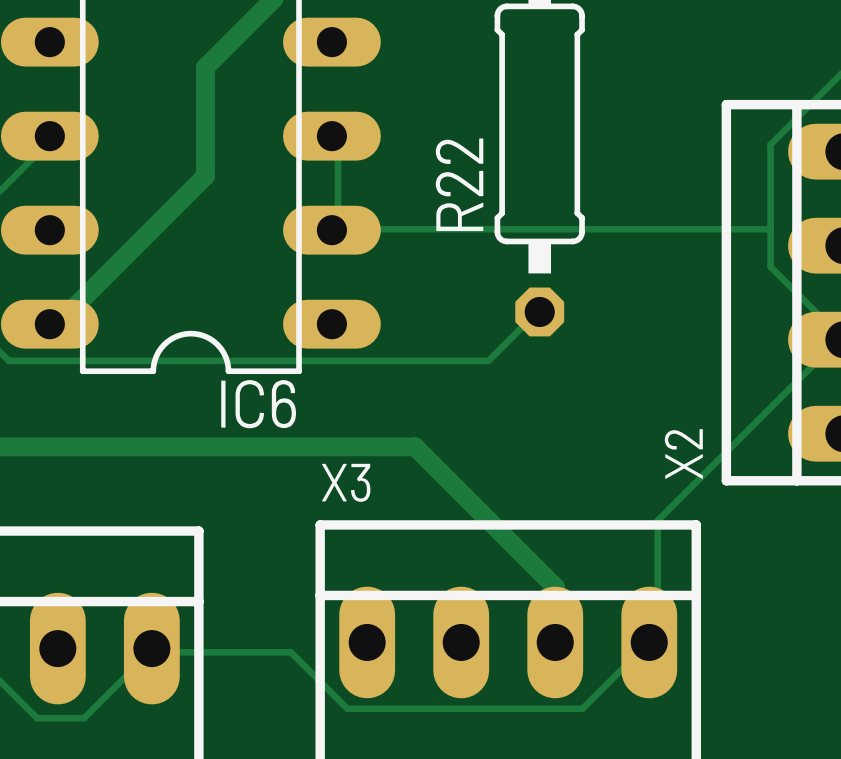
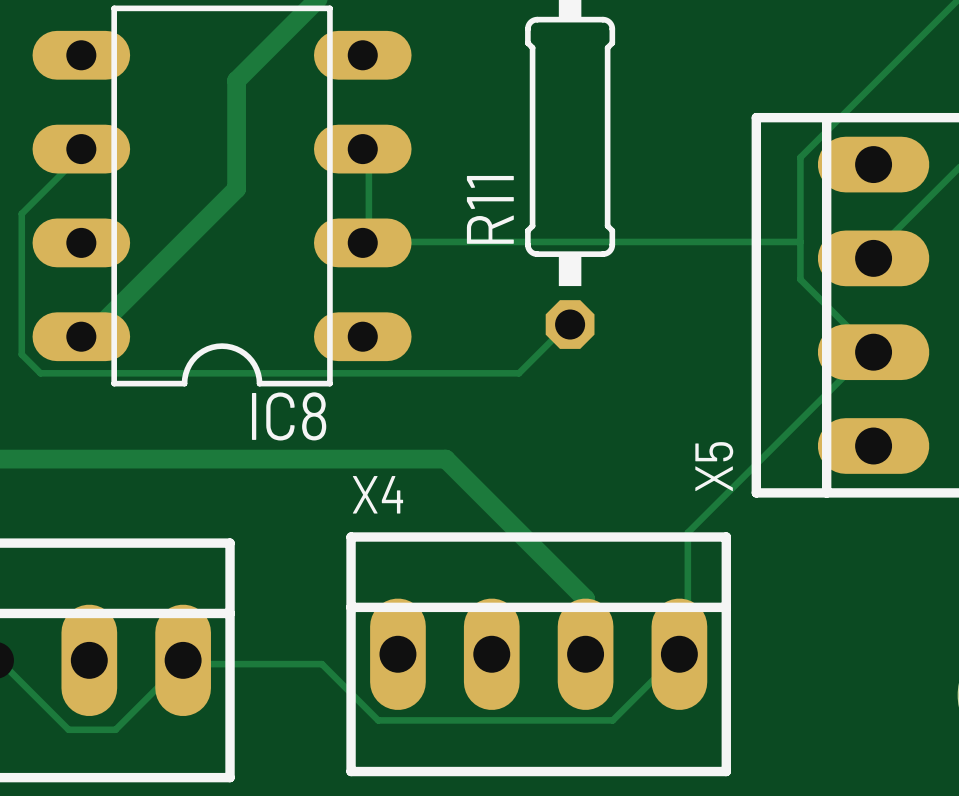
R22 name: R22 (459, 184) -> R11 (490, 209)
IC6 name: IC6 (258, 404) -> IC8 (289, 416)
X2 name: X2 (683, 454) -> X5 (714, 466)
X3 name: X3 (346, 482) -> X4 (377, 494)

